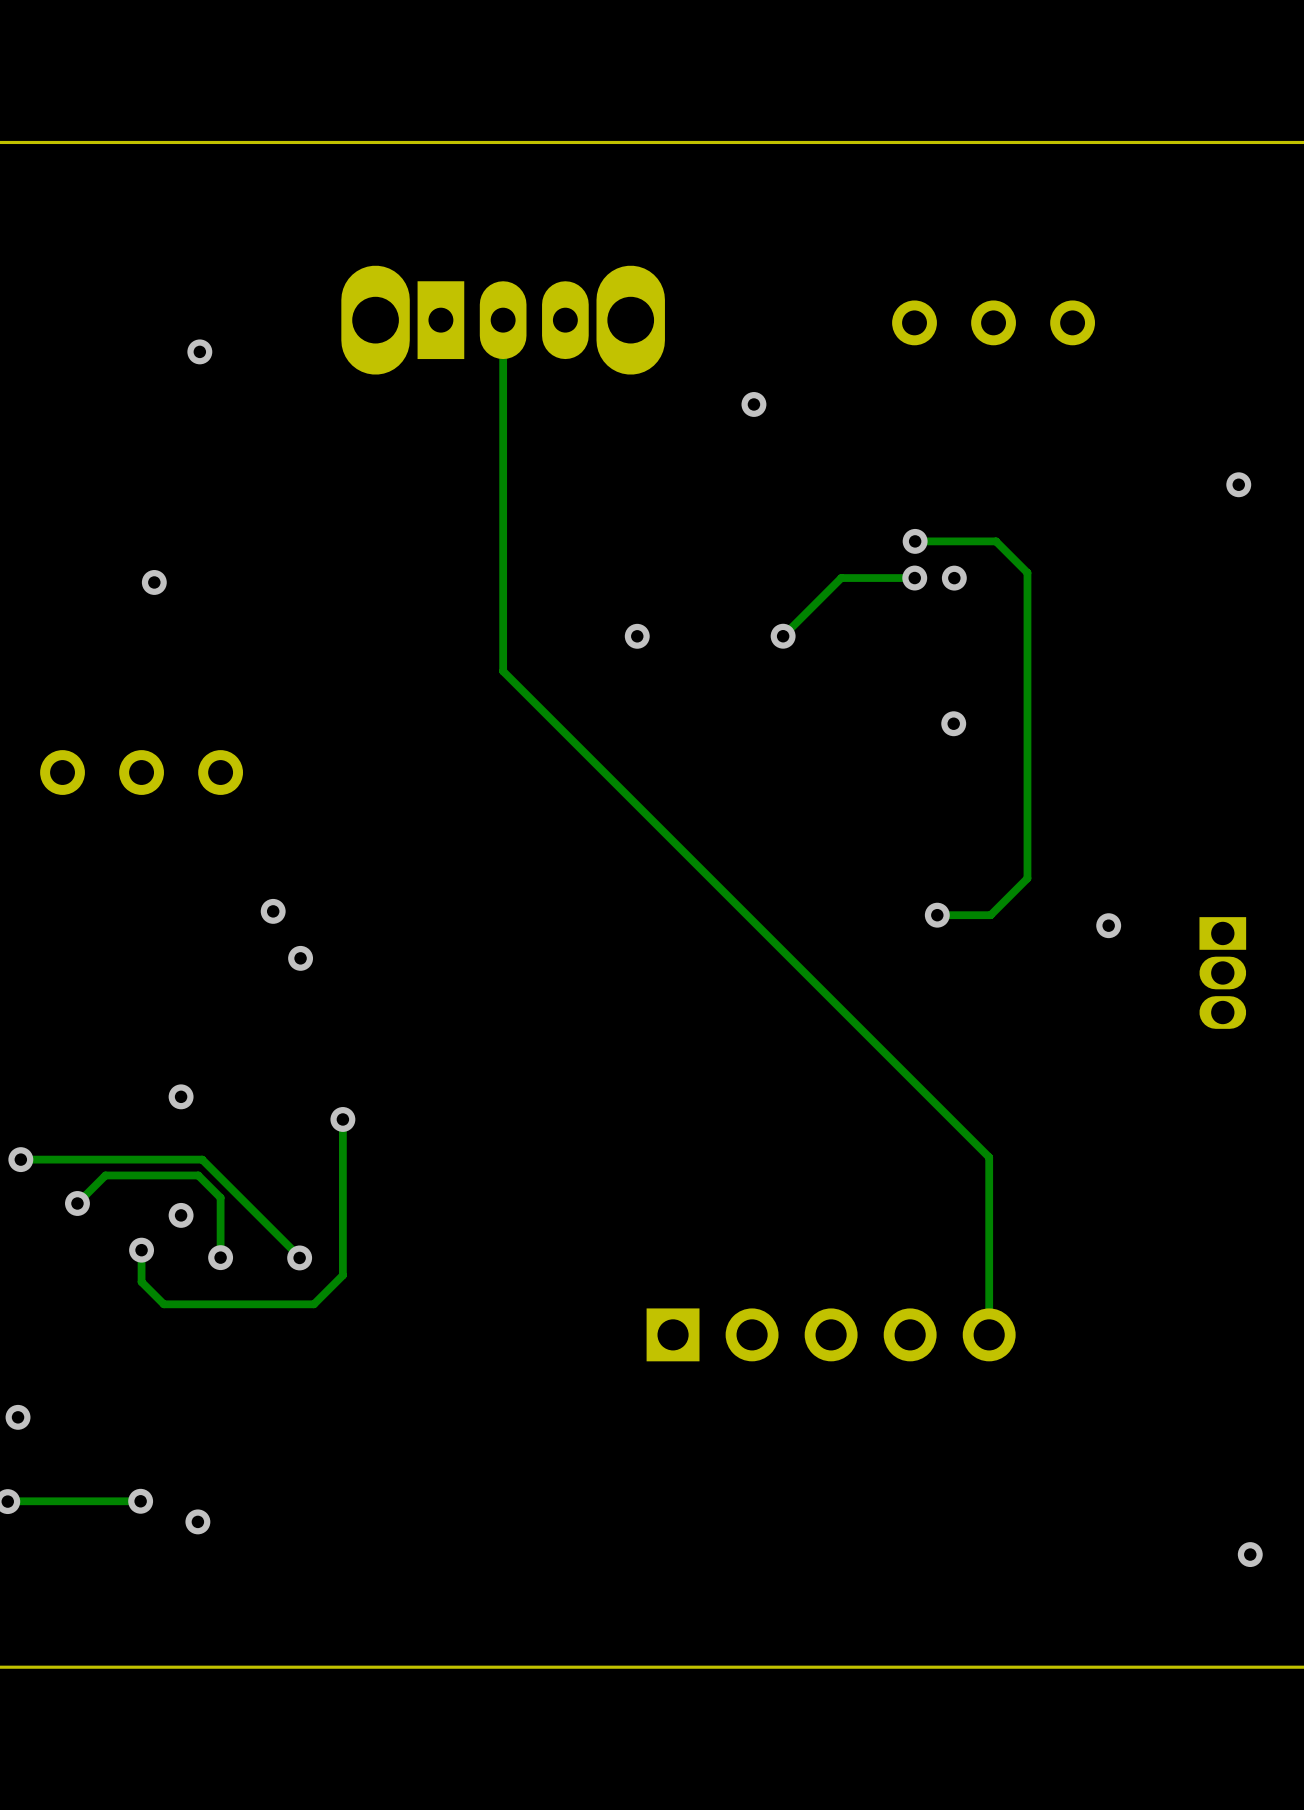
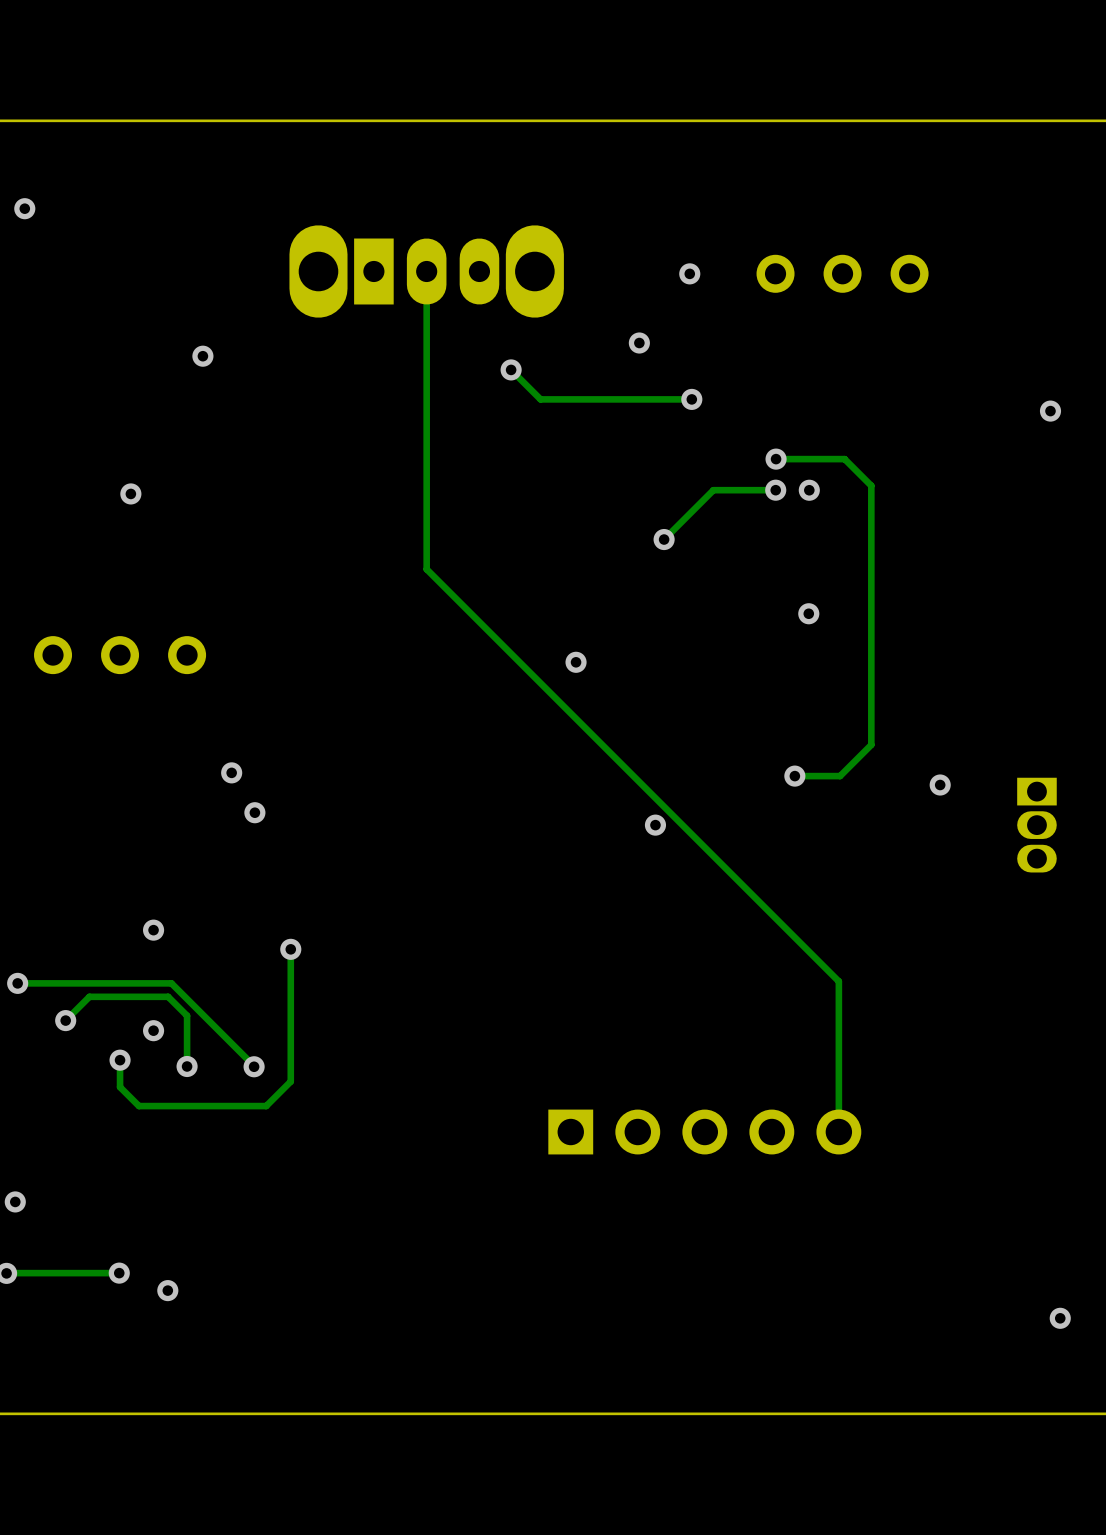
via: none -> (24, 208)
via: none -> (689, 273)
via position: (199, 351) -> (202, 356)
track: none -> (511, 369) (540, 399) (691, 399)
via: none -> (511, 369)
via: none -> (691, 399)
via: (637, 636) -> none
via: none -> (576, 662)
via: none -> (655, 825)

